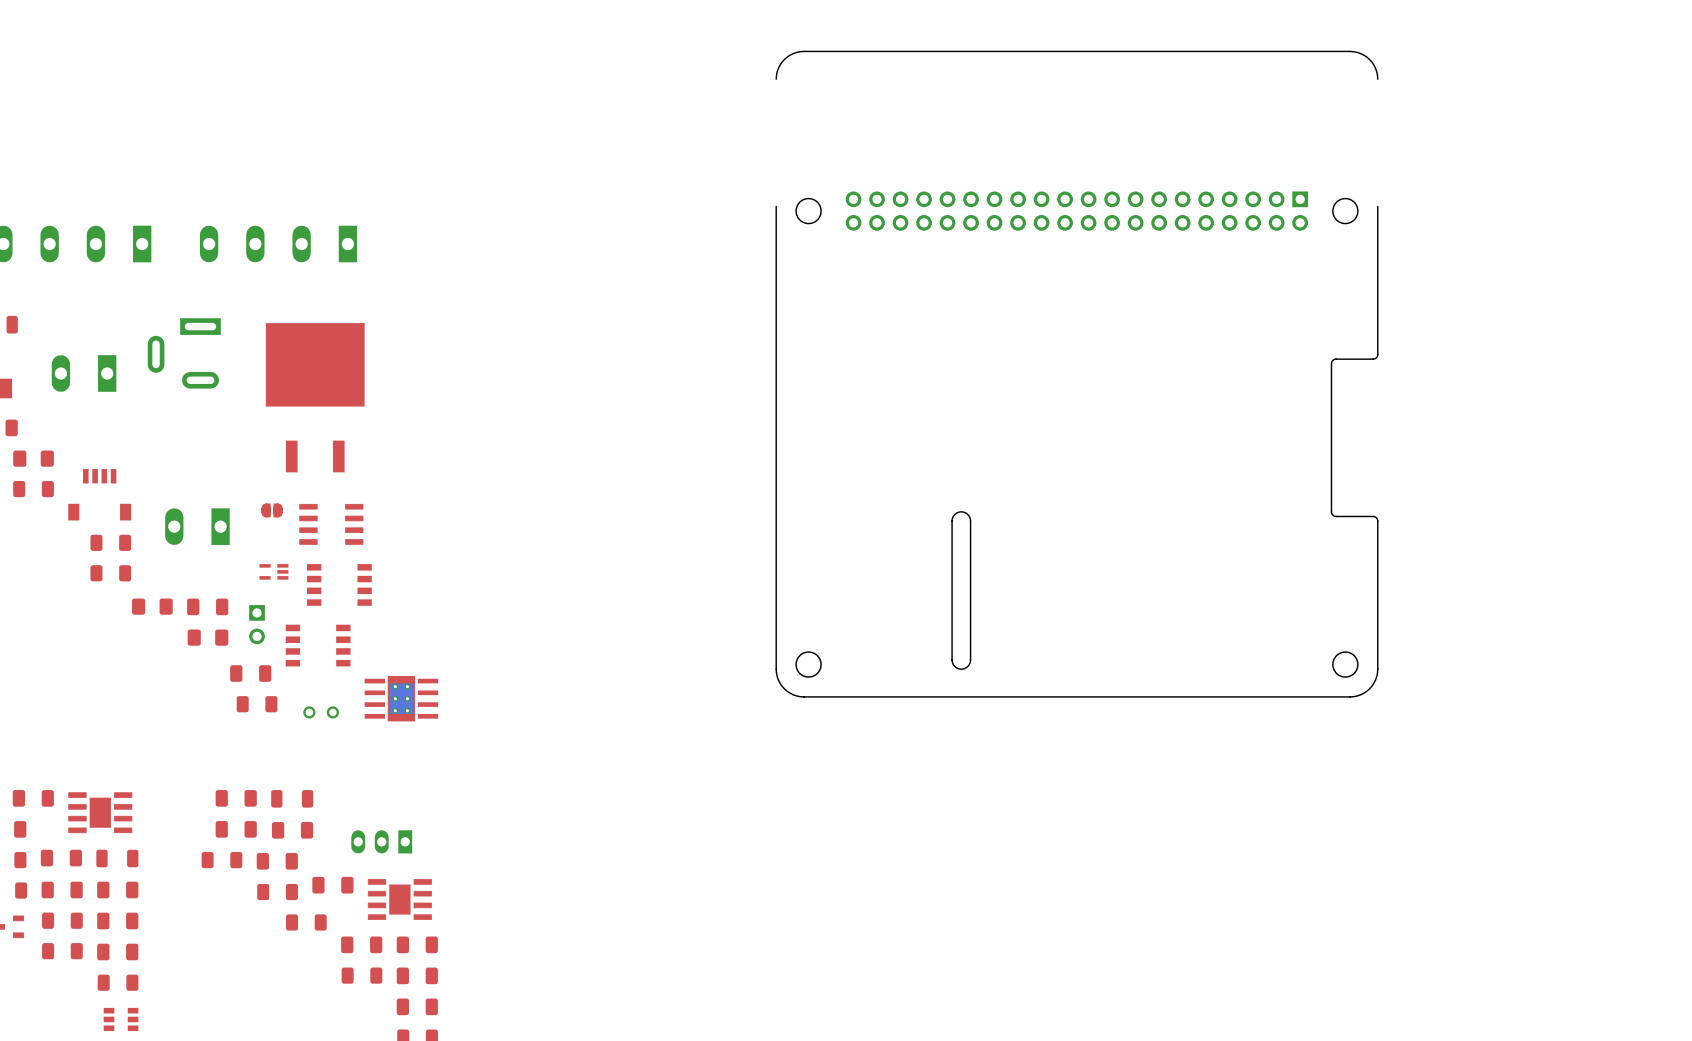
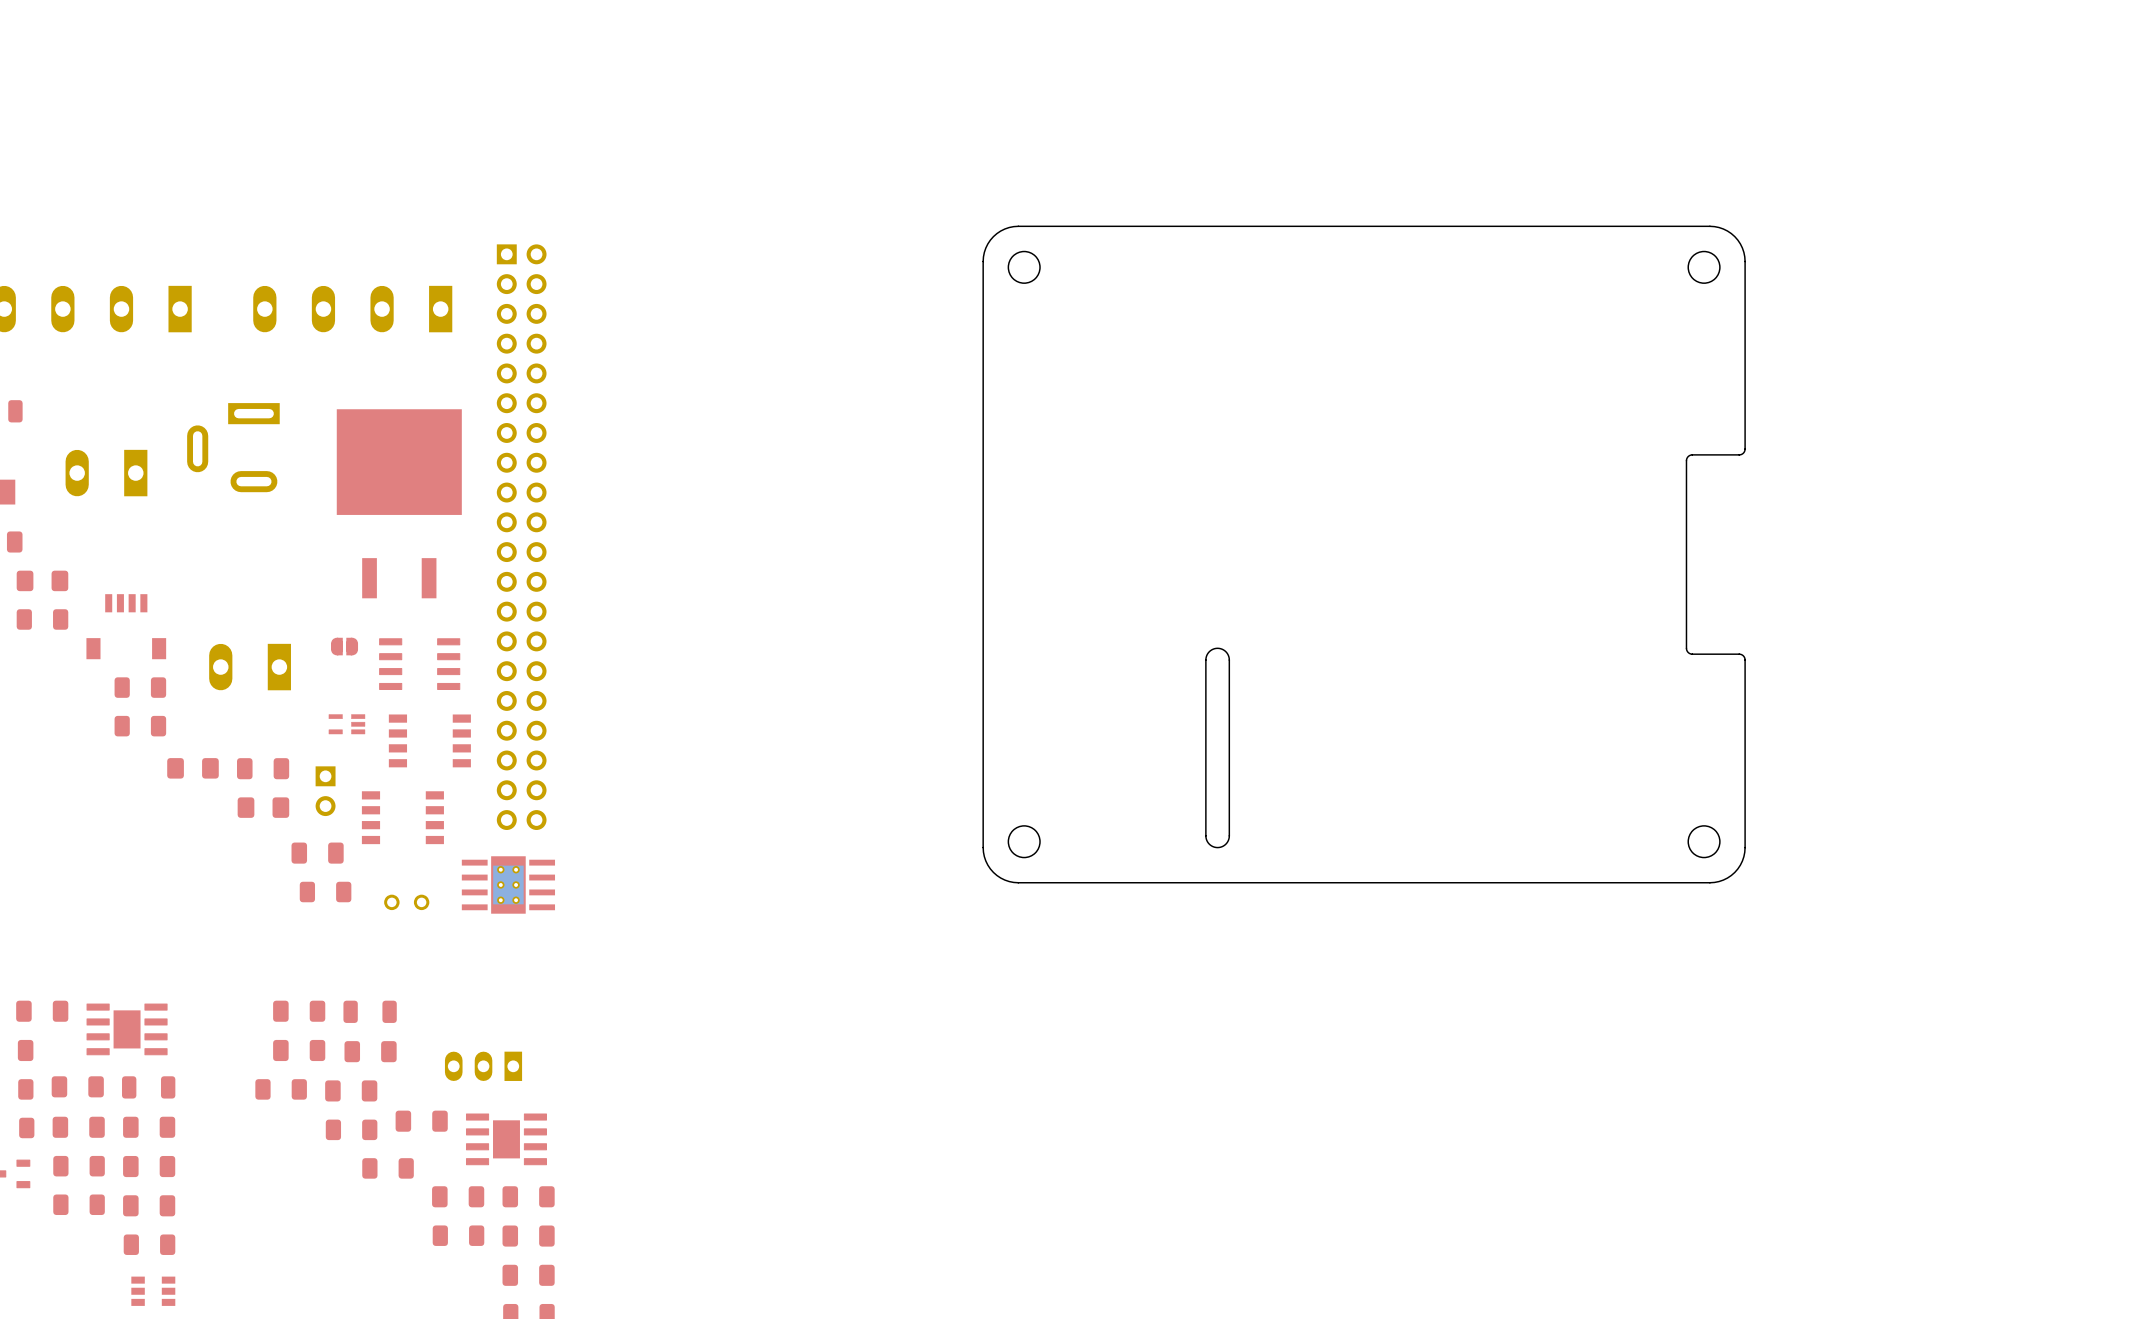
board edge: (1377, 79) (1375, 68) (1369, 59) (1360, 53) (1349, 51) (803, 51) (793, 53) (784, 59) (778, 68) (776, 79) -> (1745, 261) (1742, 248) (1734, 236) (1723, 229) (1709, 226) (1018, 226) (1004, 229) (993, 236) (985, 248) (983, 261)
part: (1076, 211) -> none
part: none -> (521, 537)

